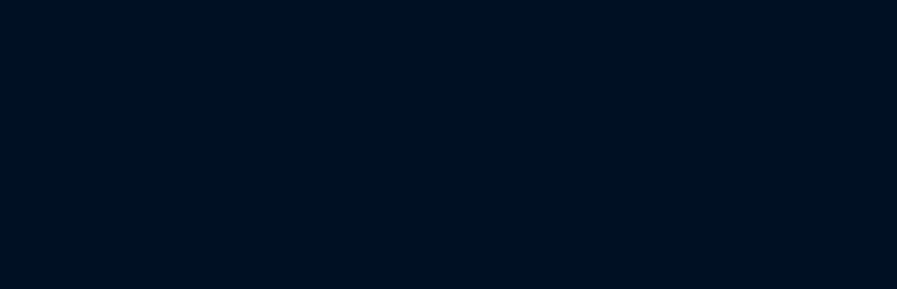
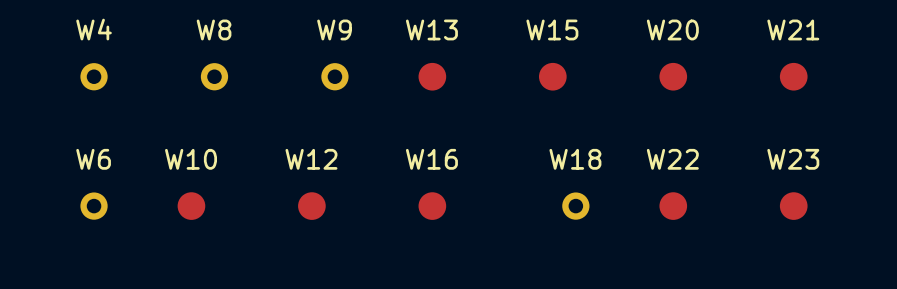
W4: none -> (94, 76)
W8: none -> (214, 76)
W9: none -> (334, 76)
W13: none -> (432, 76)
W15: none -> (552, 76)
W20: none -> (673, 76)
W21: none -> (793, 76)
W6: none -> (94, 206)
W10: none -> (191, 206)
W12: none -> (311, 206)
W16: none -> (432, 206)
W18: none -> (575, 206)
W22: none -> (673, 206)
W23: none -> (793, 206)

